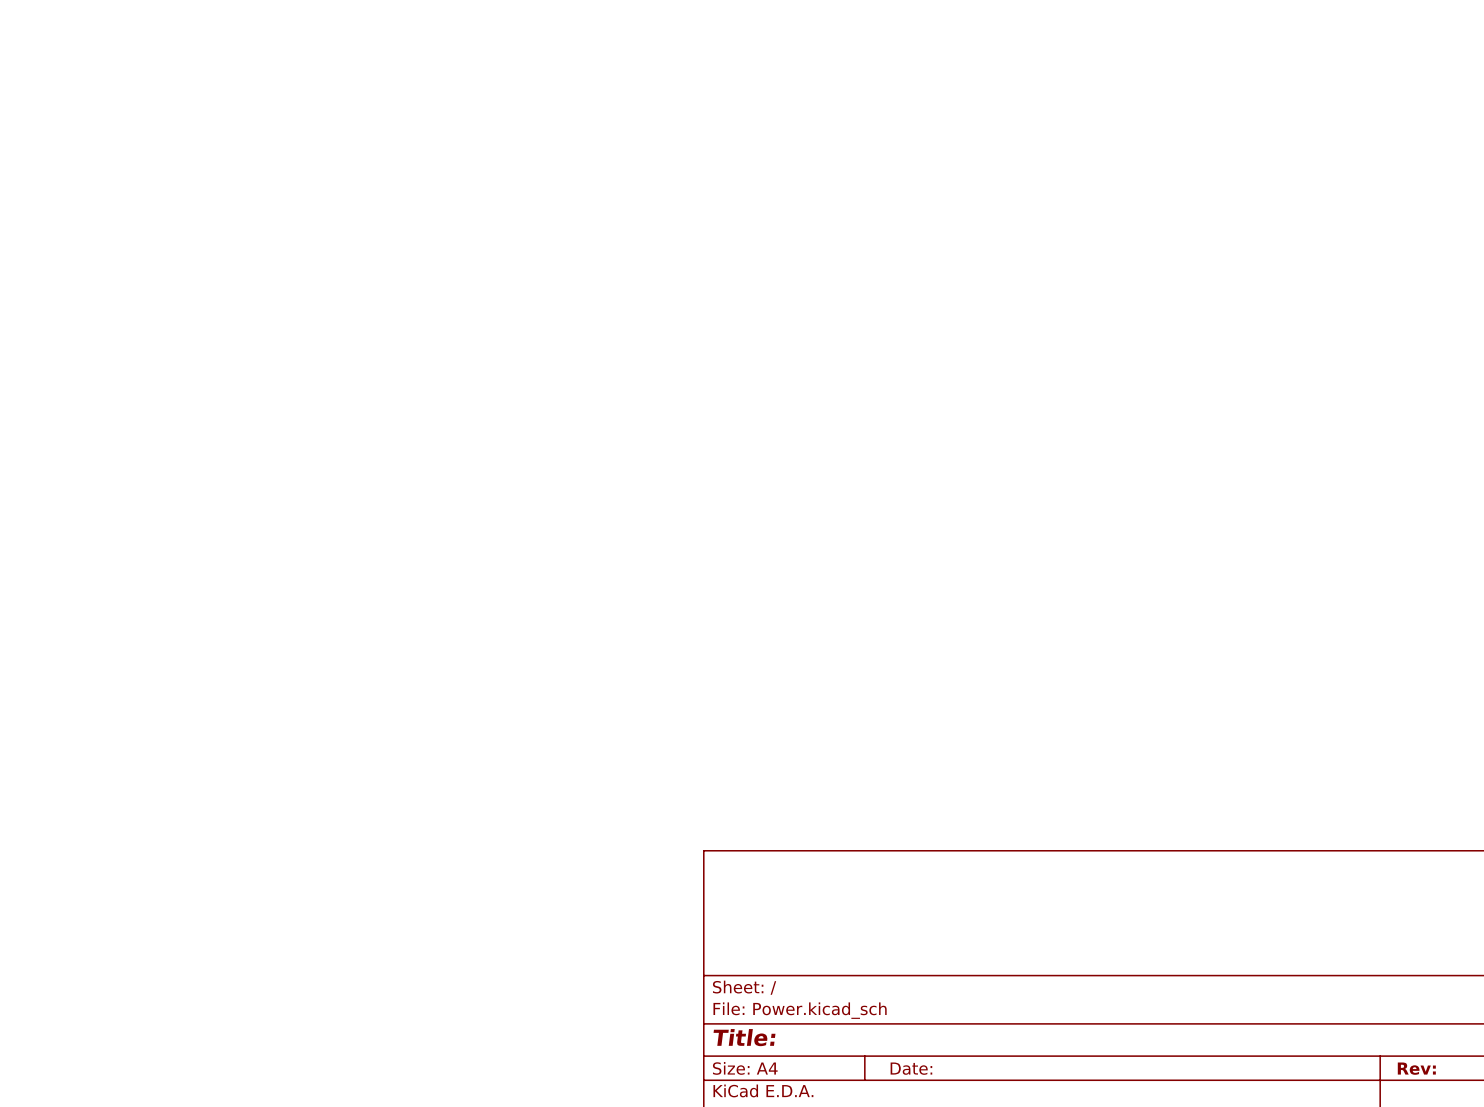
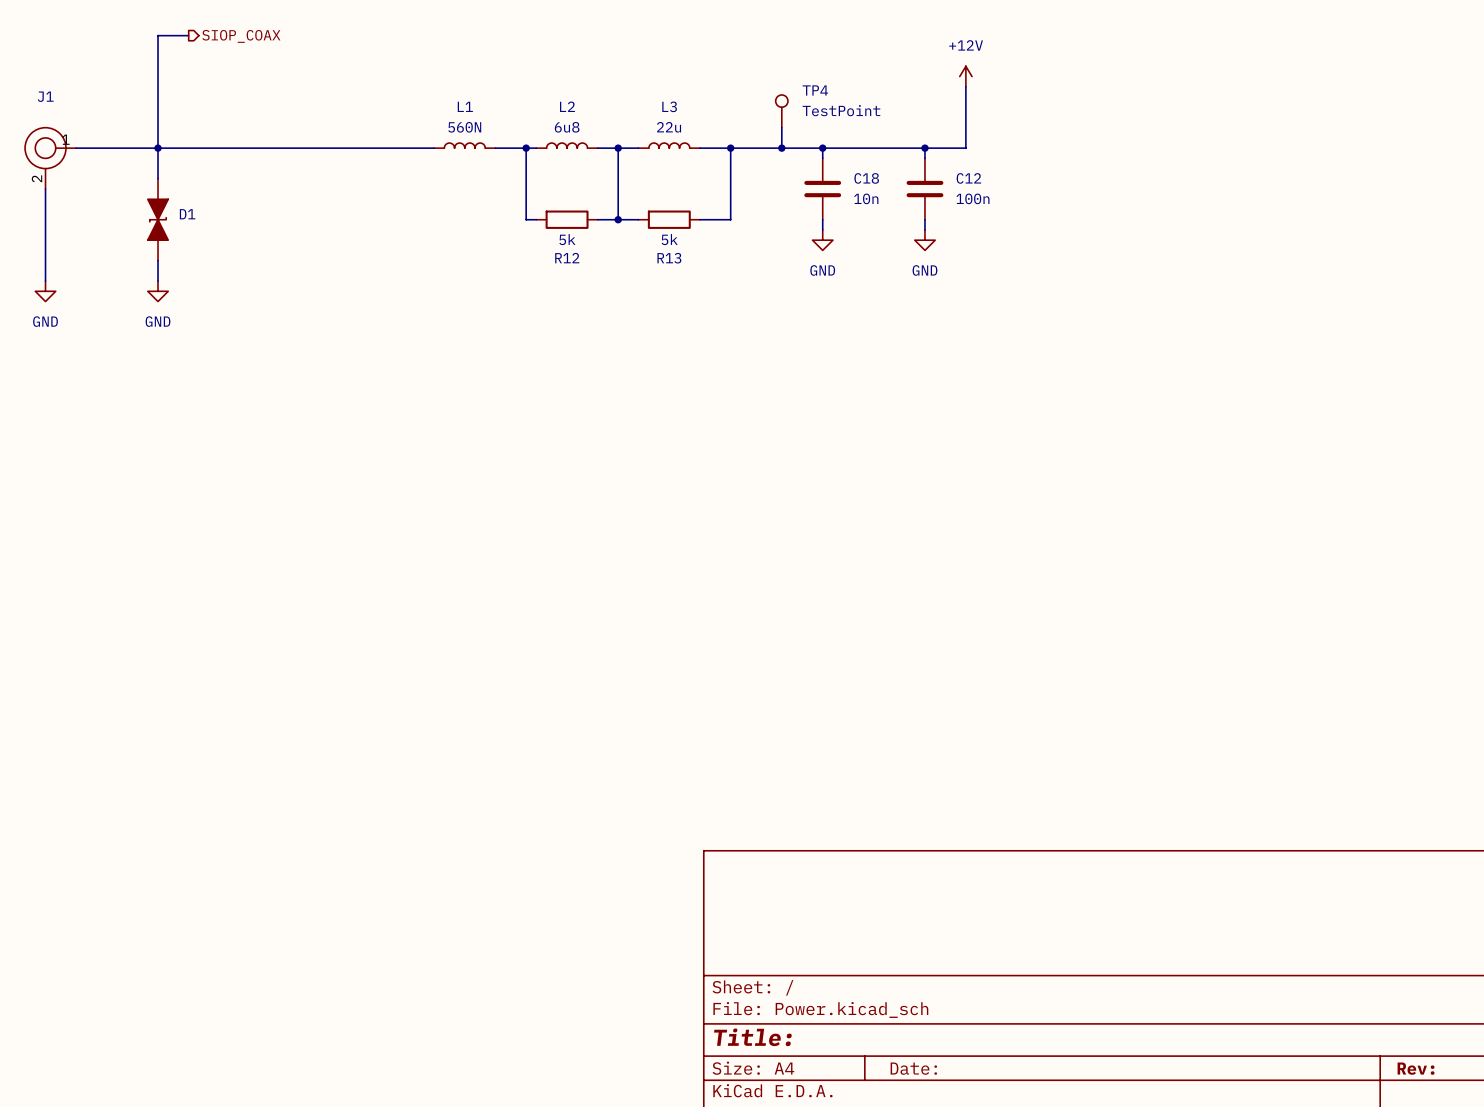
wire: none -> (188, 35) (158, 35) (158, 178)
hierarchical label: none -> SIOP_COAX (241, 36)
power symbol: none -> +12V (965, 76)
wire: none -> (965, 86) (965, 148) (700, 148)
TP4: none -> TestPoint (781, 111)
wire: none -> (781, 127) (781, 148)
L1: none -> 560N (464, 145)
L2: none -> 6u8 (567, 145)
L3: none -> 22u (669, 145)
wire: none -> (76, 148) (434, 148)
junction: none -> (158, 148)
wire: none -> (495, 148) (536, 148)
wire: none -> (526, 148) (526, 219) (536, 219)
junction: none -> (526, 148)
wire: none -> (597, 148) (638, 148)
wire: none -> (618, 148) (618, 219)
junction: none -> (618, 148)
wire: none -> (730, 148) (730, 219) (700, 219)
junction: none -> (730, 148)
junction: none -> (781, 148)
wire: none -> (822, 148) (822, 158)
junction: none -> (822, 148)
wire: none -> (924, 148) (924, 158)
junction: none -> (924, 148)
J1: none -> (50, 158)
wire: none -> (45, 189) (45, 281)
C18: none -> 10n (822, 189)
C12: none -> 100n (924, 189)
D1: none -> (158, 219)
R12: none -> 5k (567, 219)
wire: none -> (597, 219) (638, 219)
junction: none -> (618, 219)
R13: none -> 5k (669, 219)
wire: none -> (822, 219) (822, 229)
wire: none -> (924, 219) (924, 229)
power symbol: none -> GND (822, 240)
power symbol: none -> GND (924, 240)
wire: none -> (158, 260) (158, 281)
power symbol: none -> GND (45, 291)
power symbol: none -> GND (158, 291)

